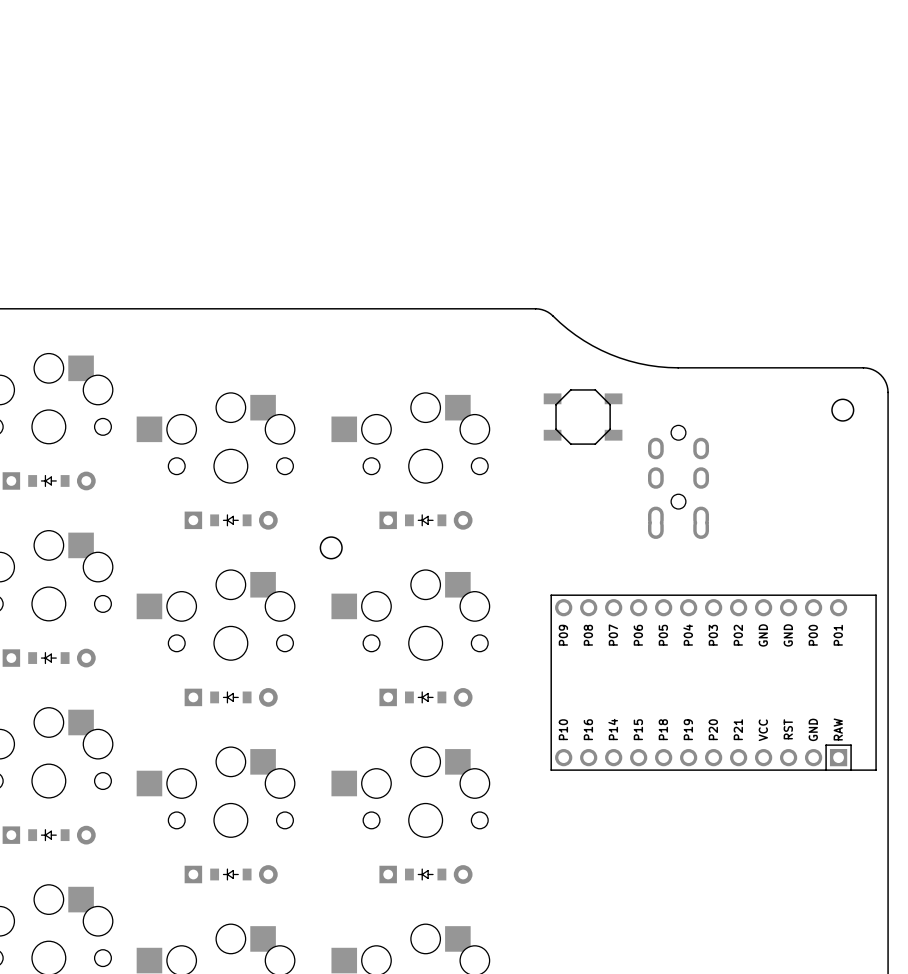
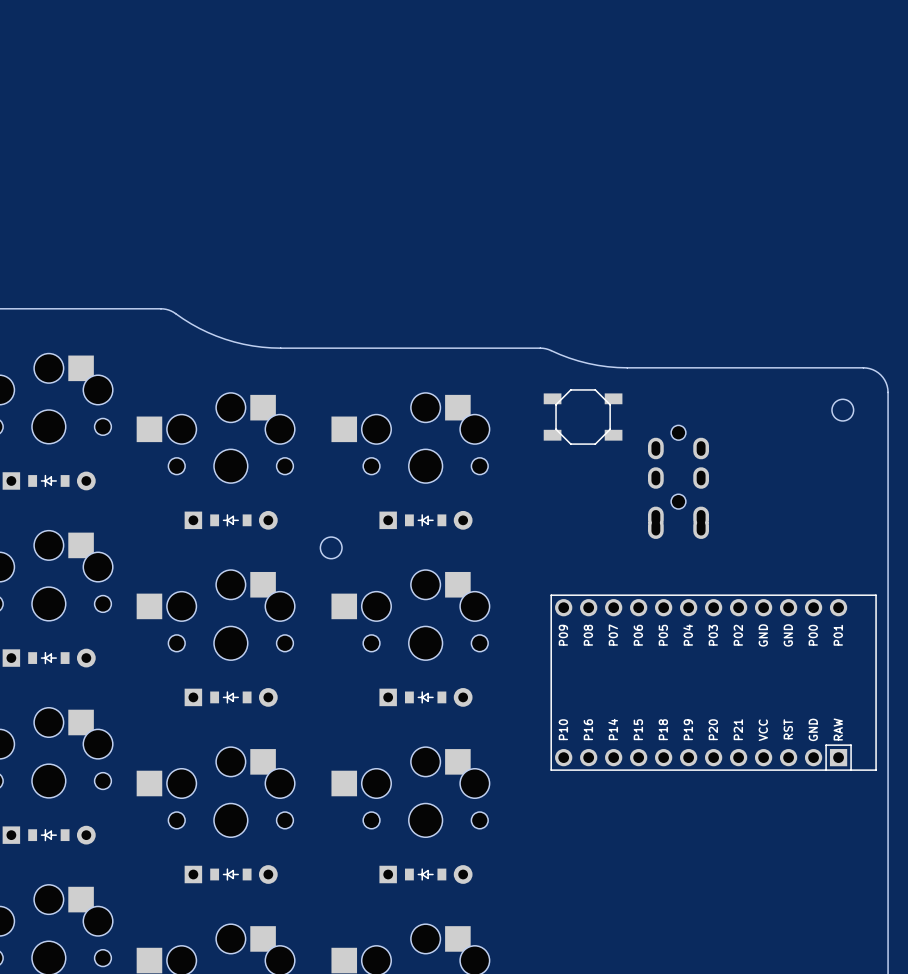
board edge: (160, 308) (538, 309) (550, 313) (583, 340) (610, 354) (638, 363) (678, 367) -> (160, 308) (171, 310) (191, 323) (216, 336) (261, 347) (540, 348) (597, 365) (617, 367) (678, 367)

